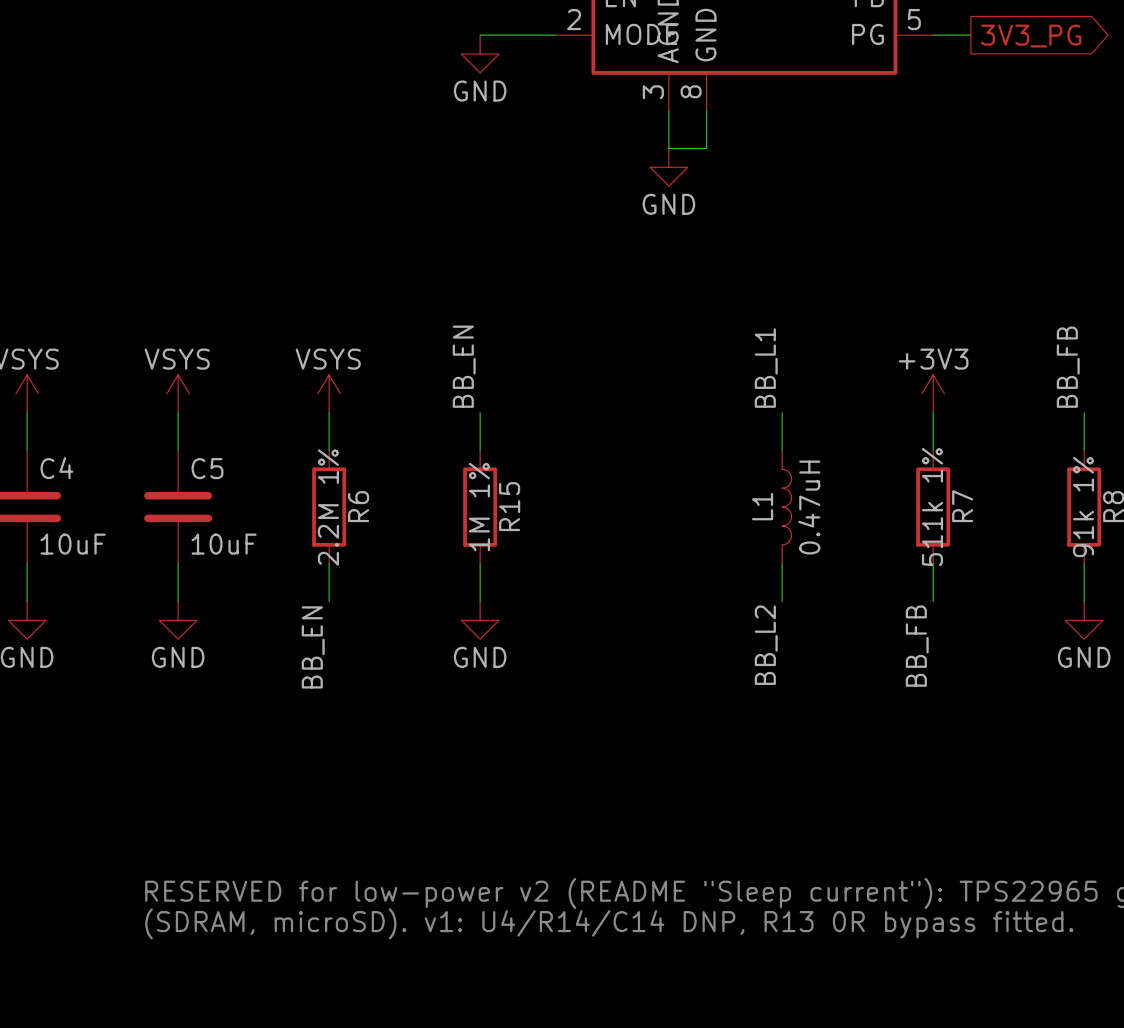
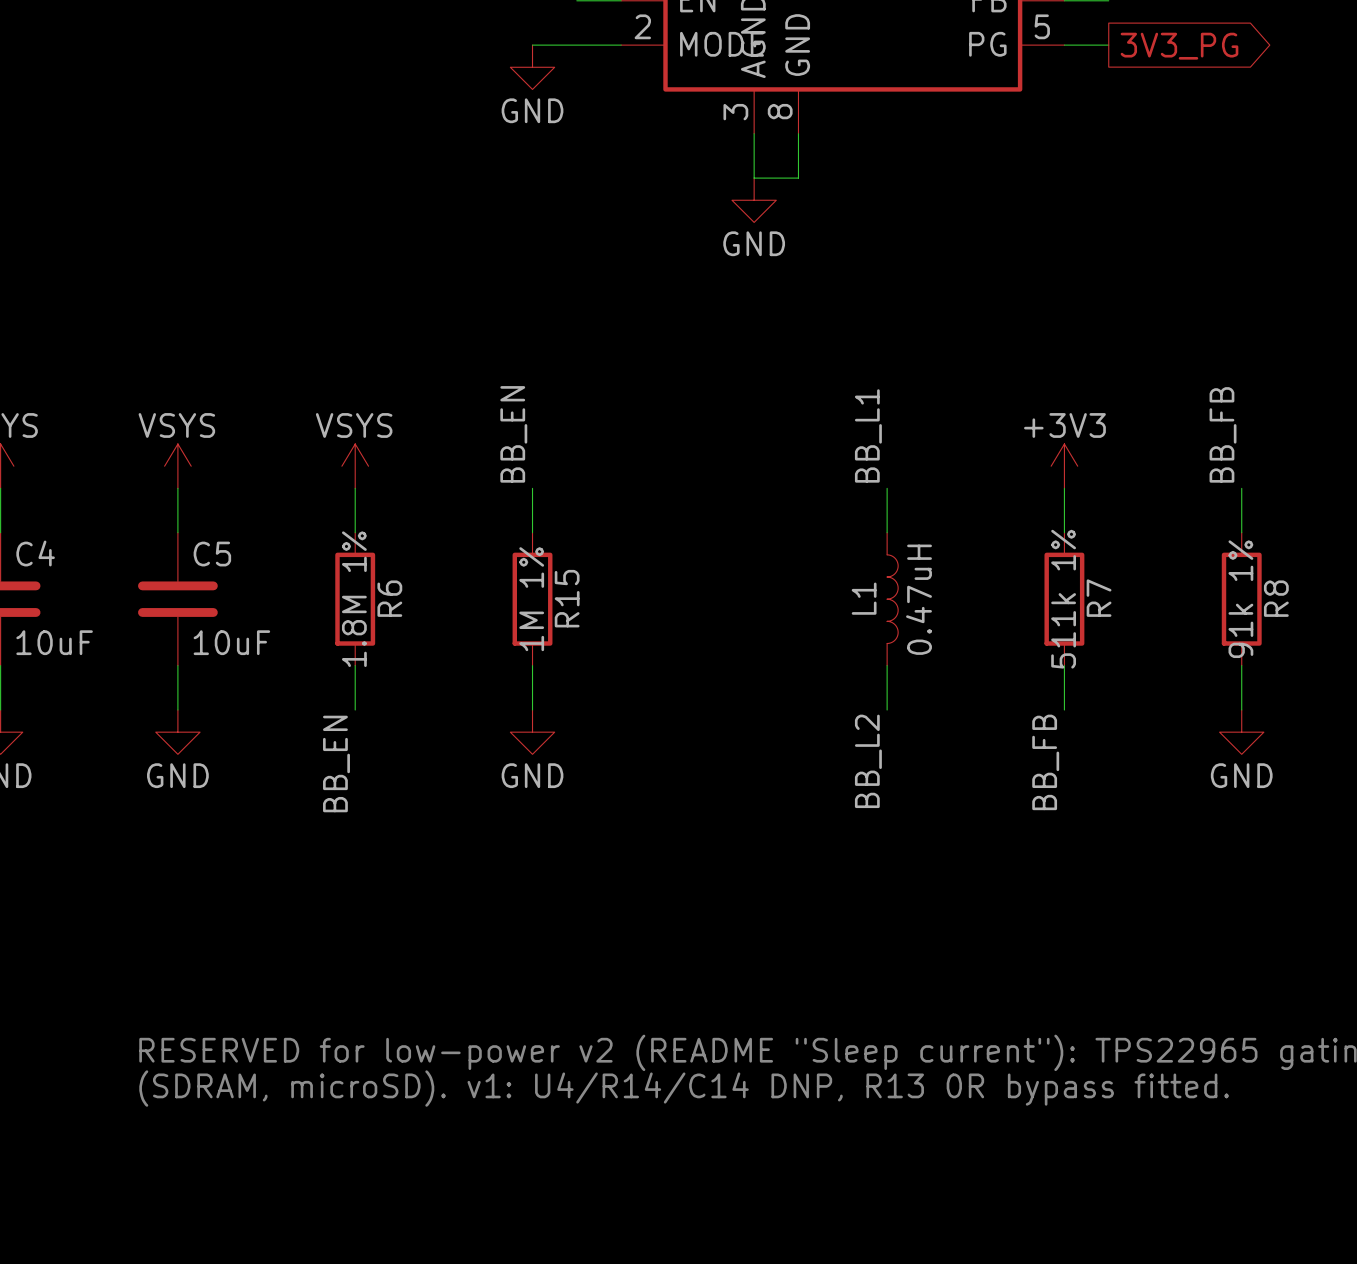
R6 value: 2.2M 1% (328, 507) -> 1.8M 1% (354, 599)

